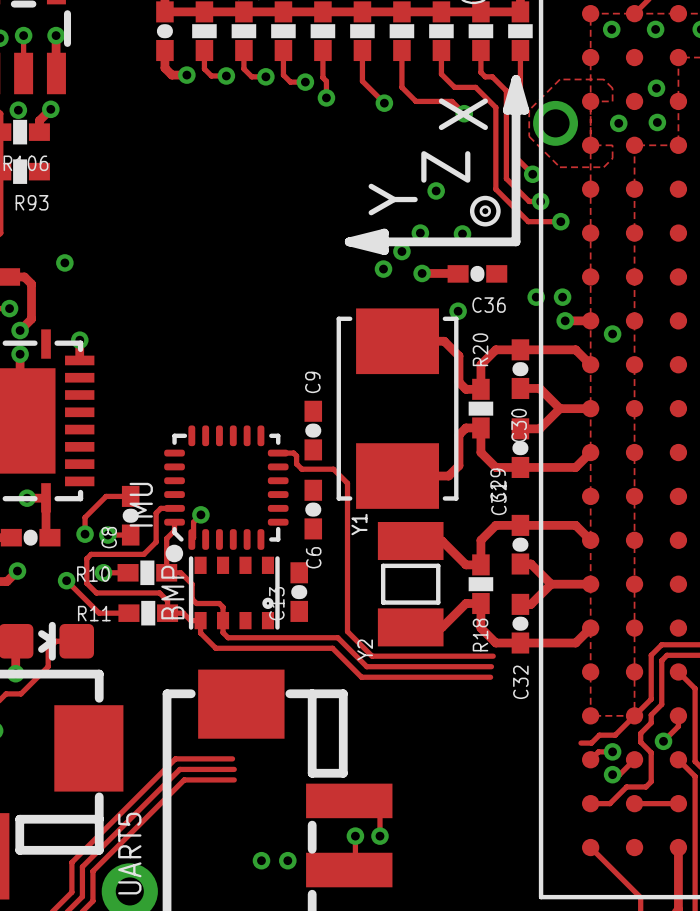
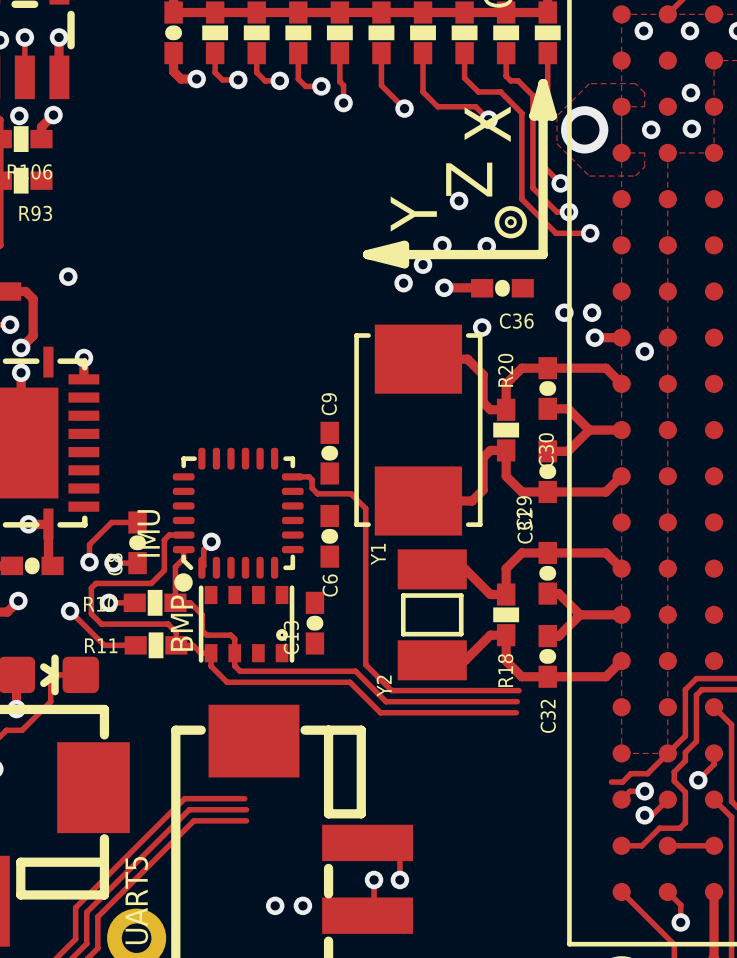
track: none -> (667, 891) (680, 904) (680, 922)
via: none -> (680, 922)

